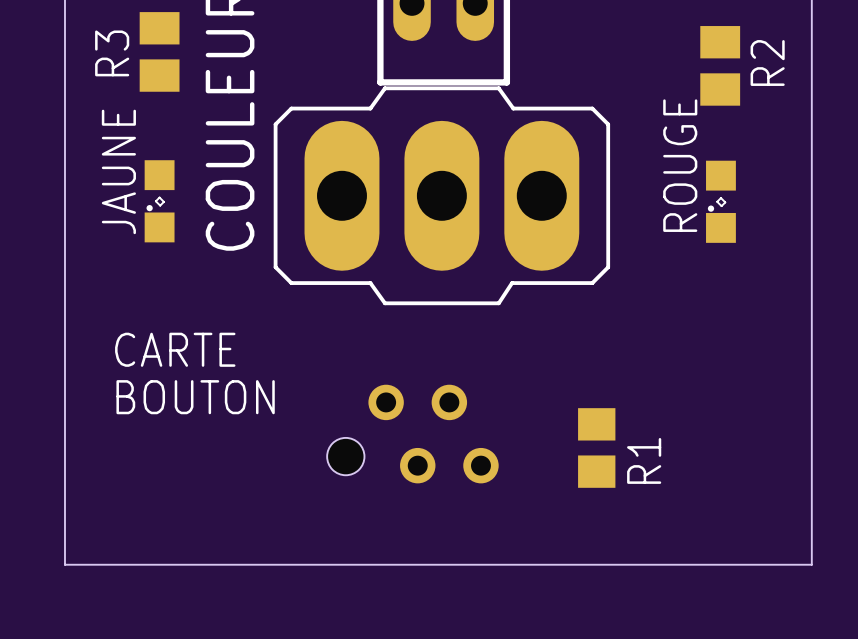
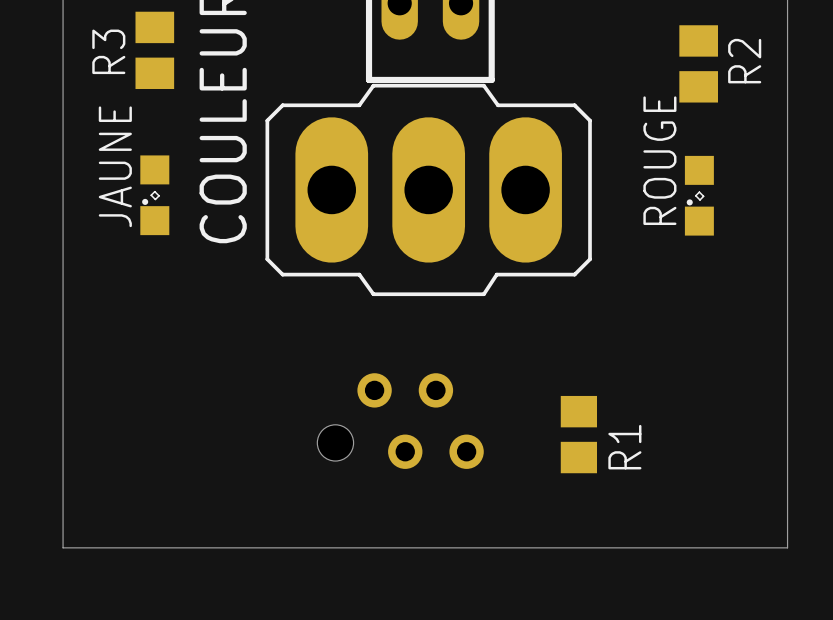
text: CARTE (175, 349) -> none
text: BOUTON (195, 397) -> none

